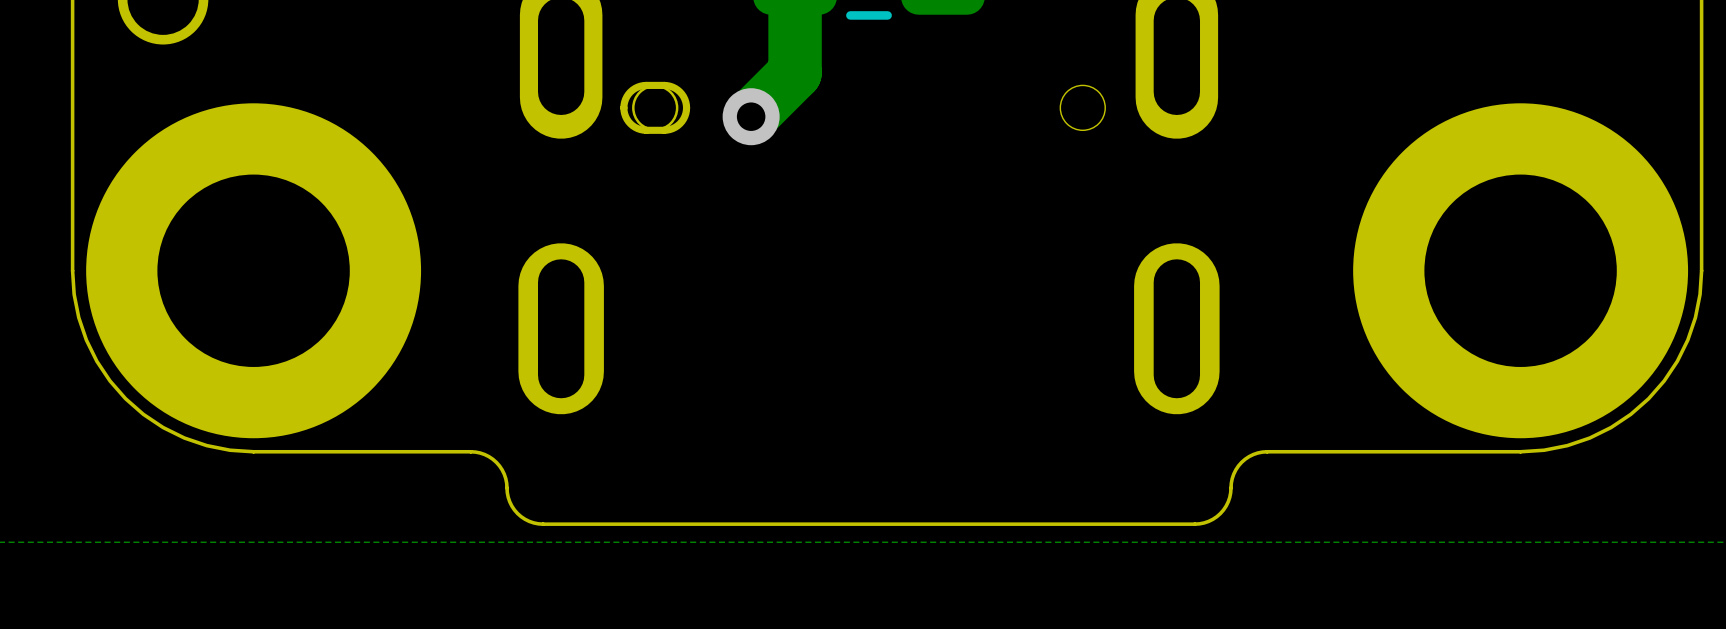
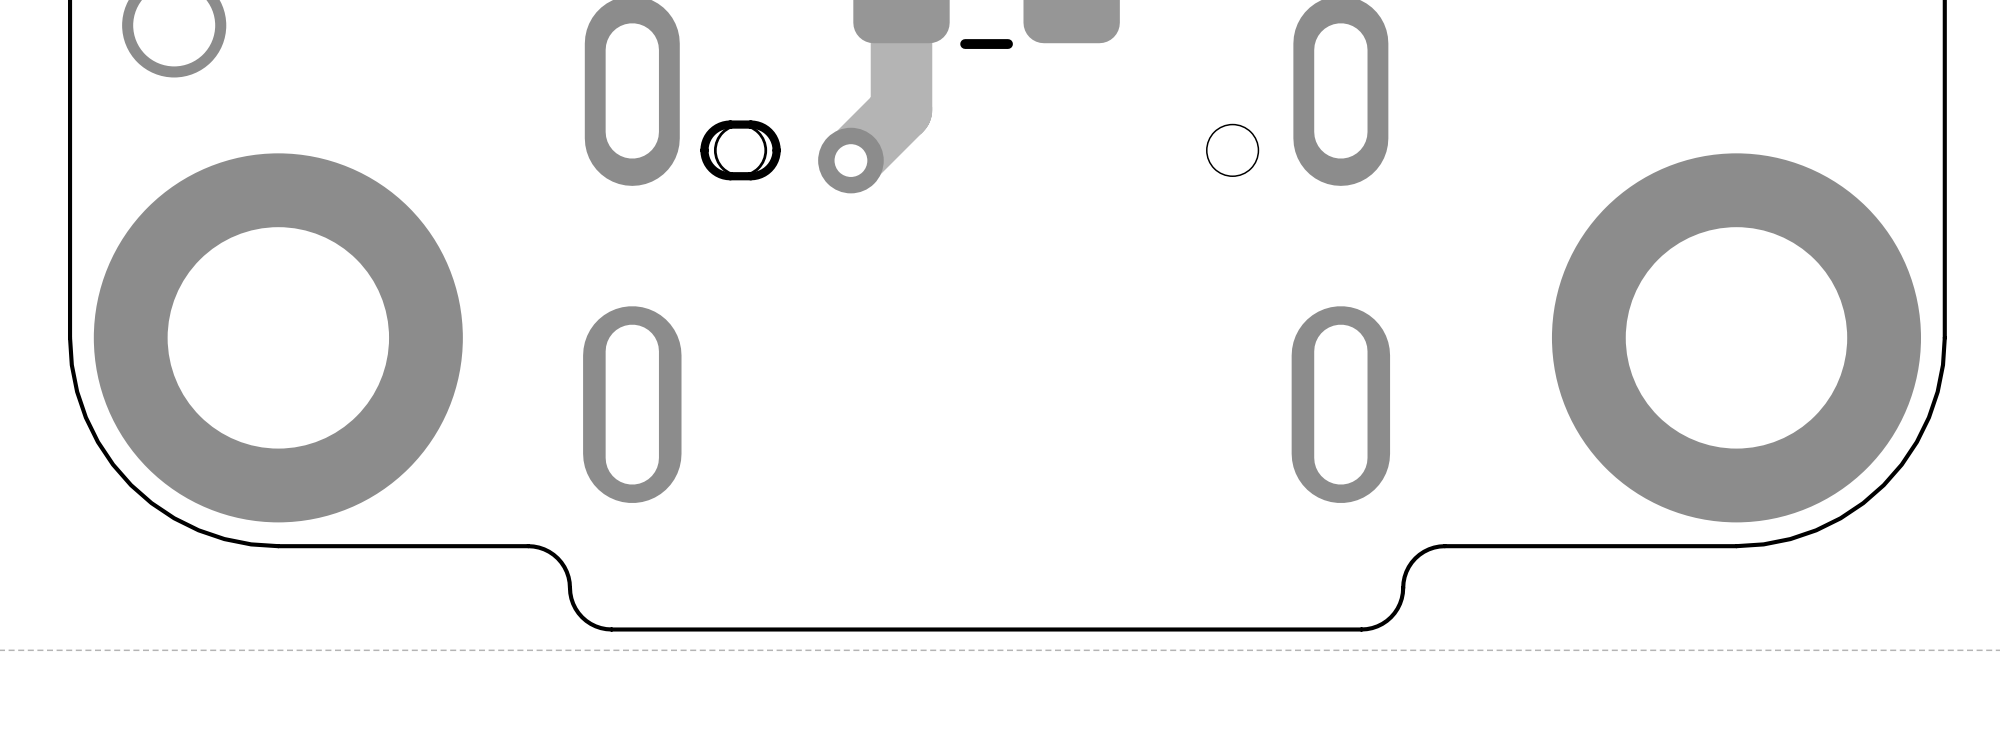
part footprint: [86, 103, 422, 439] -> [93, 153, 463, 523]
part footprint: [1353, 103, 1689, 439] -> [1551, 153, 1922, 523]

